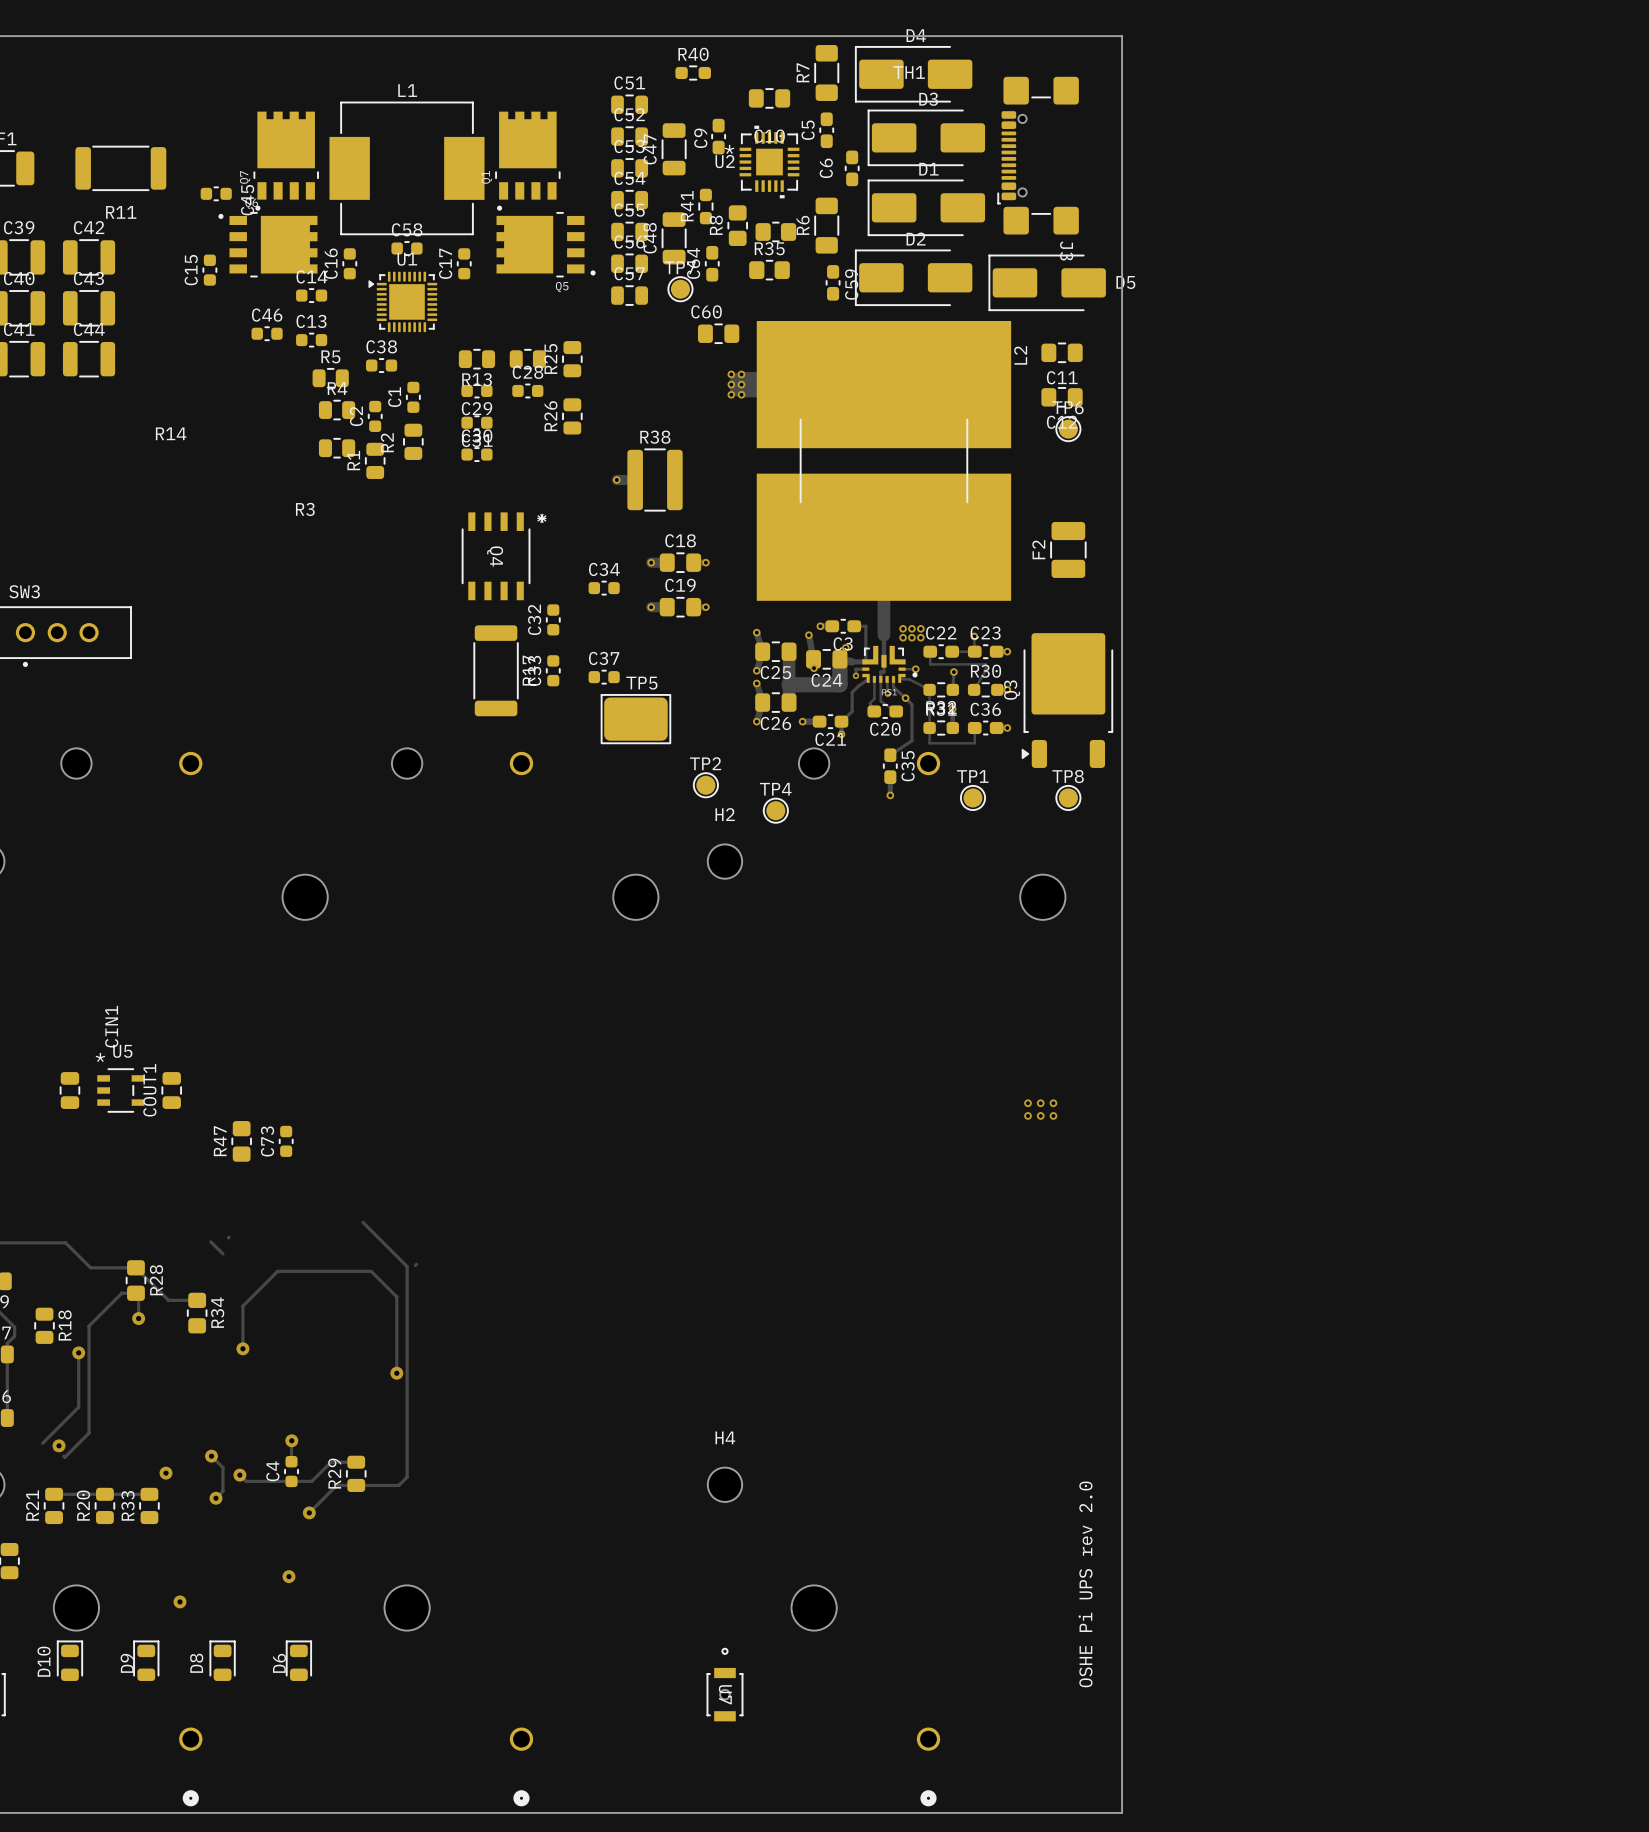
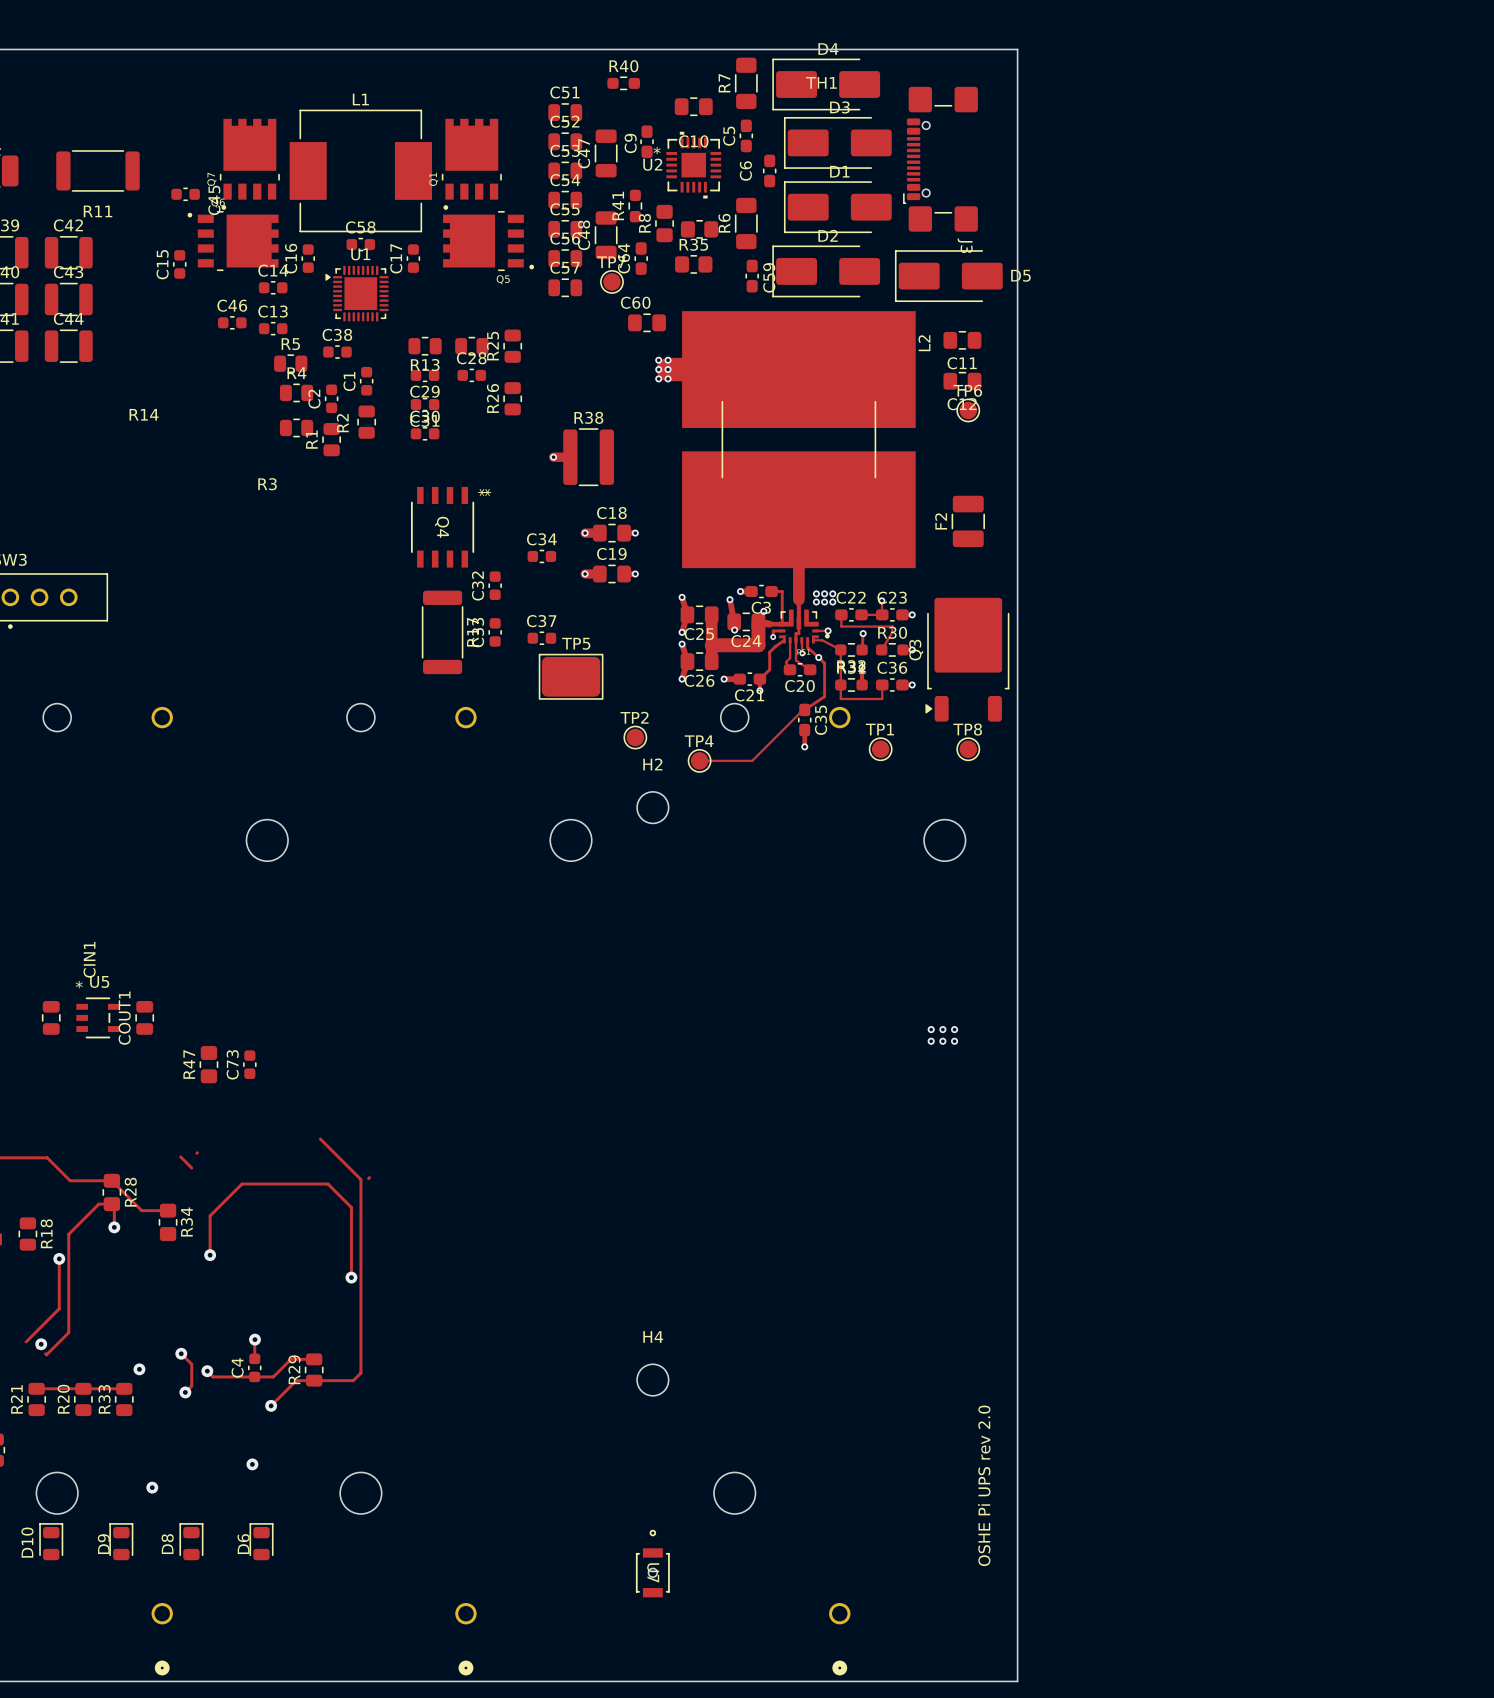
track: none -> (804, 708) (752, 760) (699, 760)

